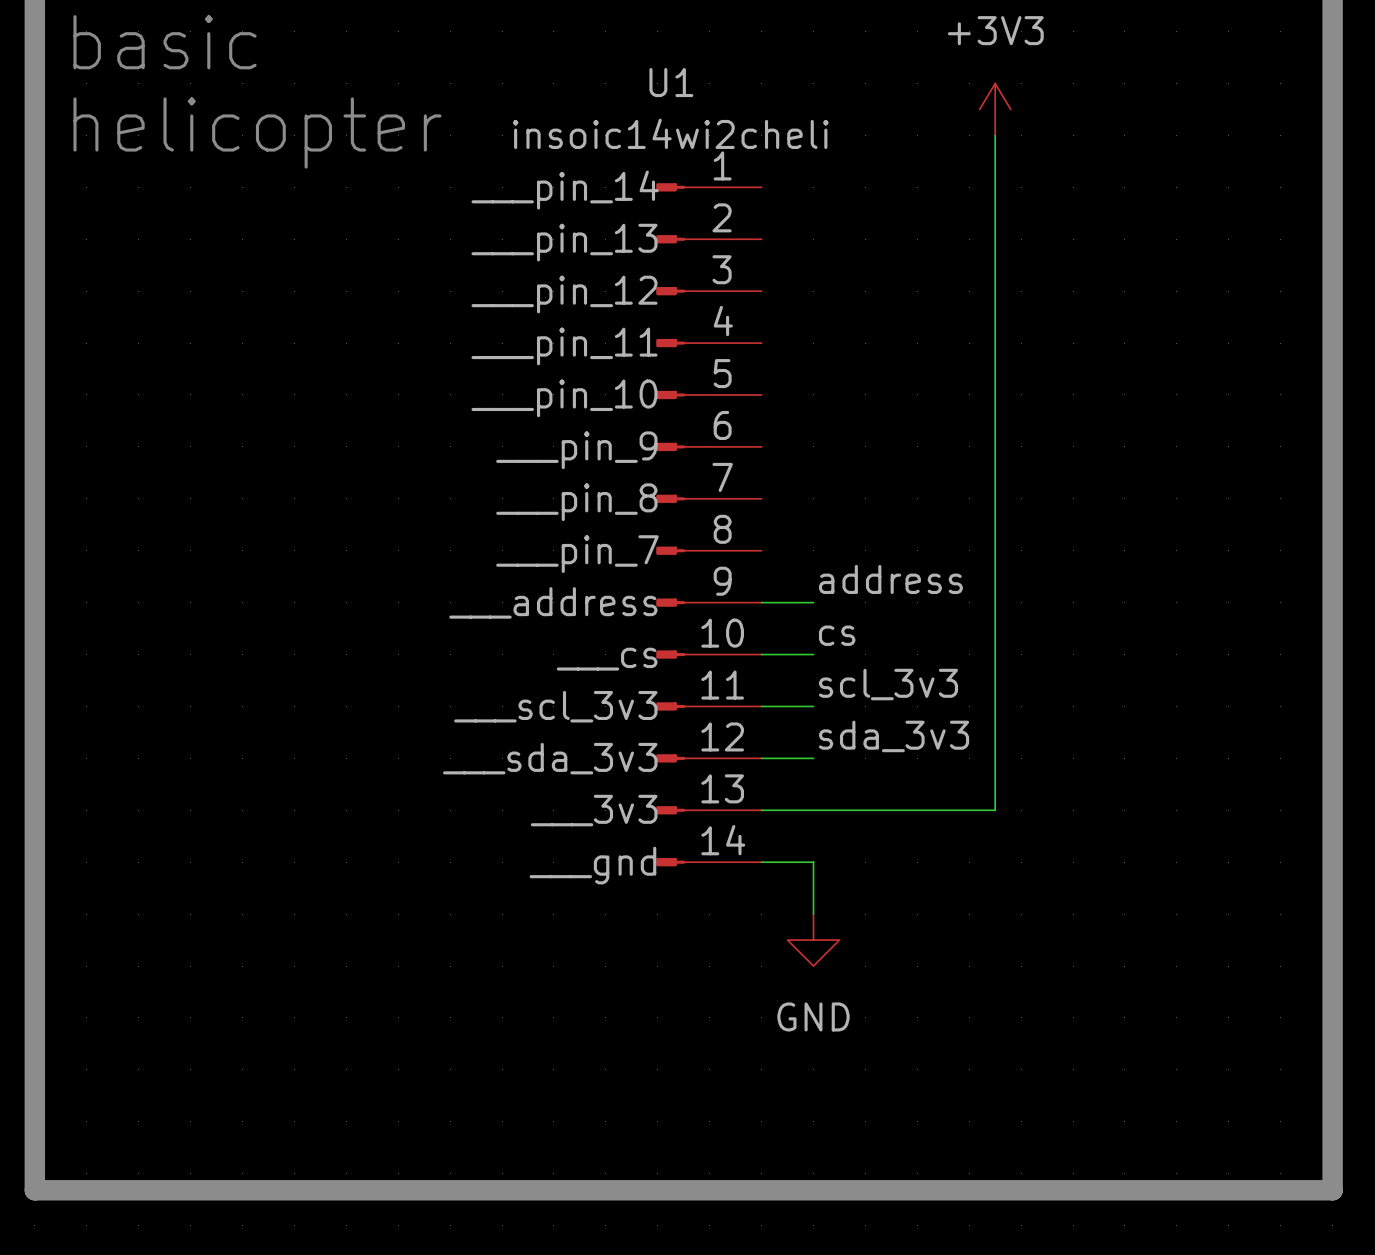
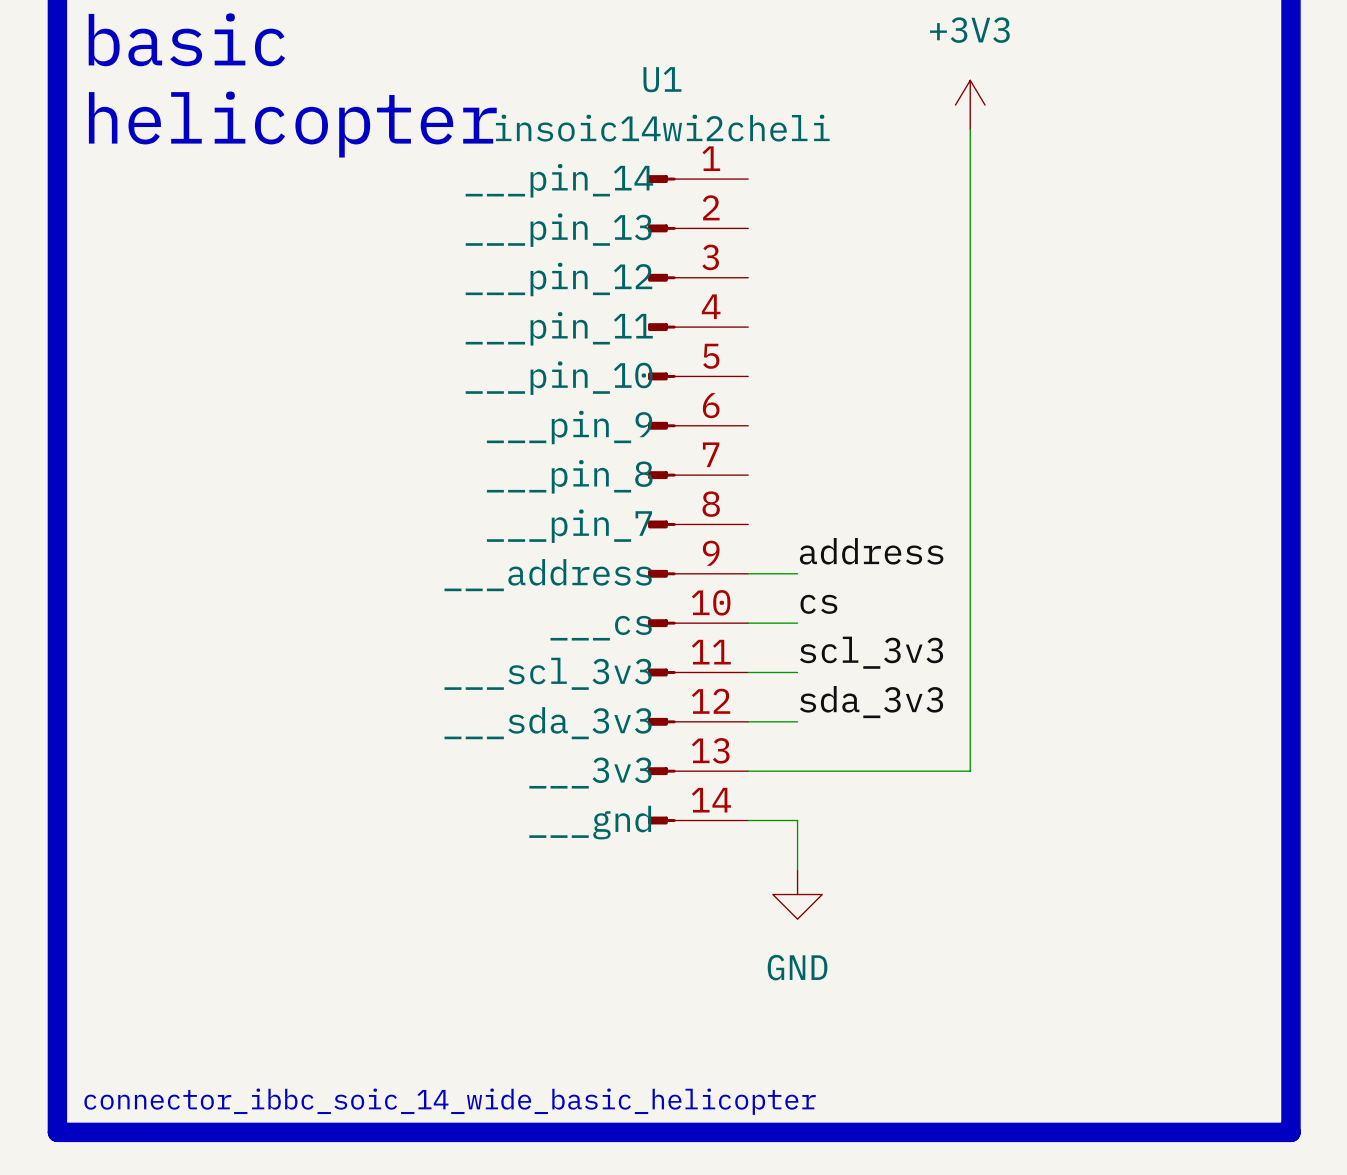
text: none -> connector_ibbc_soic_14_wide_basic_helicopter (450, 1101)

